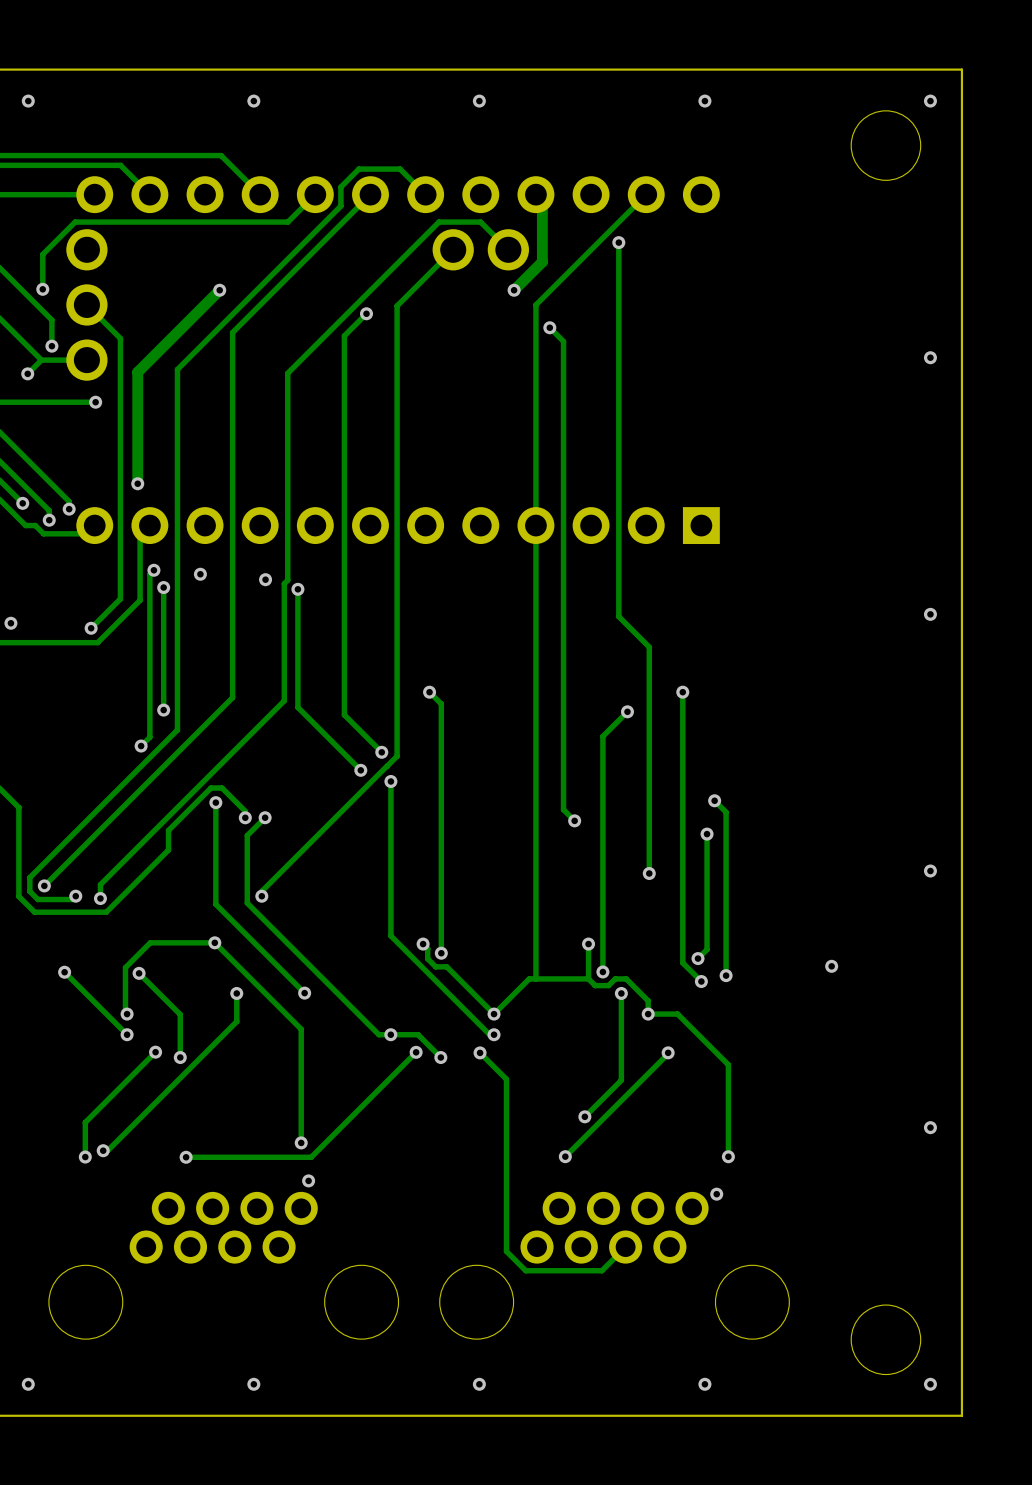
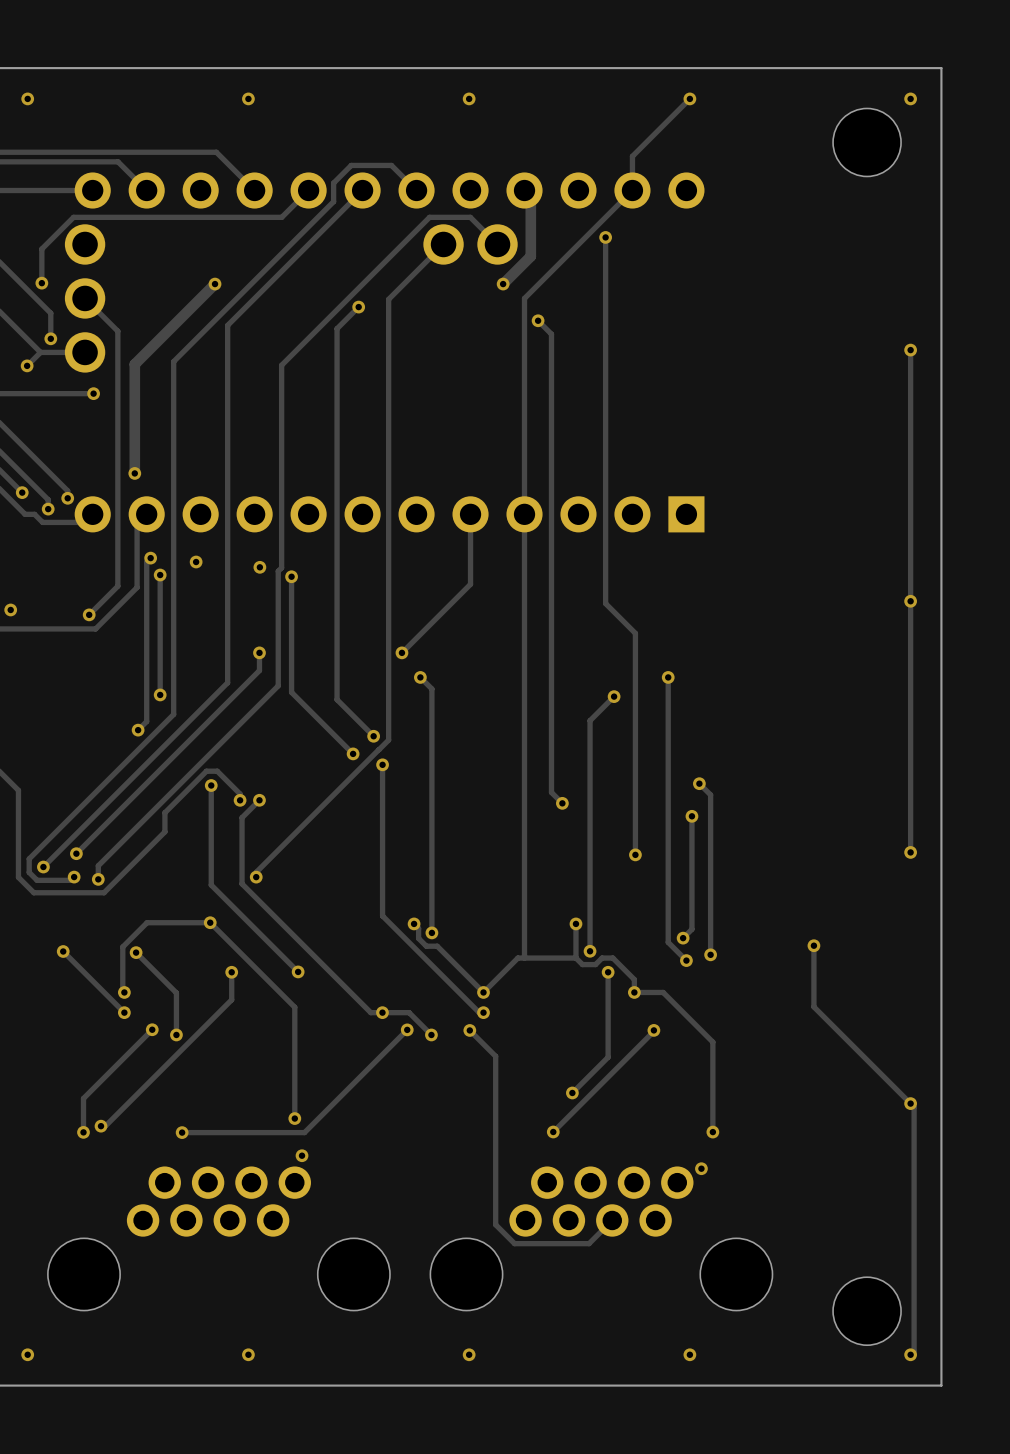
track: none -> (689, 98) (632, 156) (632, 190)
track: none -> (910, 350) (910, 852)
track: none -> (470, 514) (470, 584) (401, 652)
track: none -> (259, 652) (259, 670) (76, 853)
via: none -> (259, 652)
via: none -> (401, 652)
via: none -> (76, 853)
track: none -> (813, 945) (813, 1006) (914, 1107) (914, 1351) (910, 1354)

